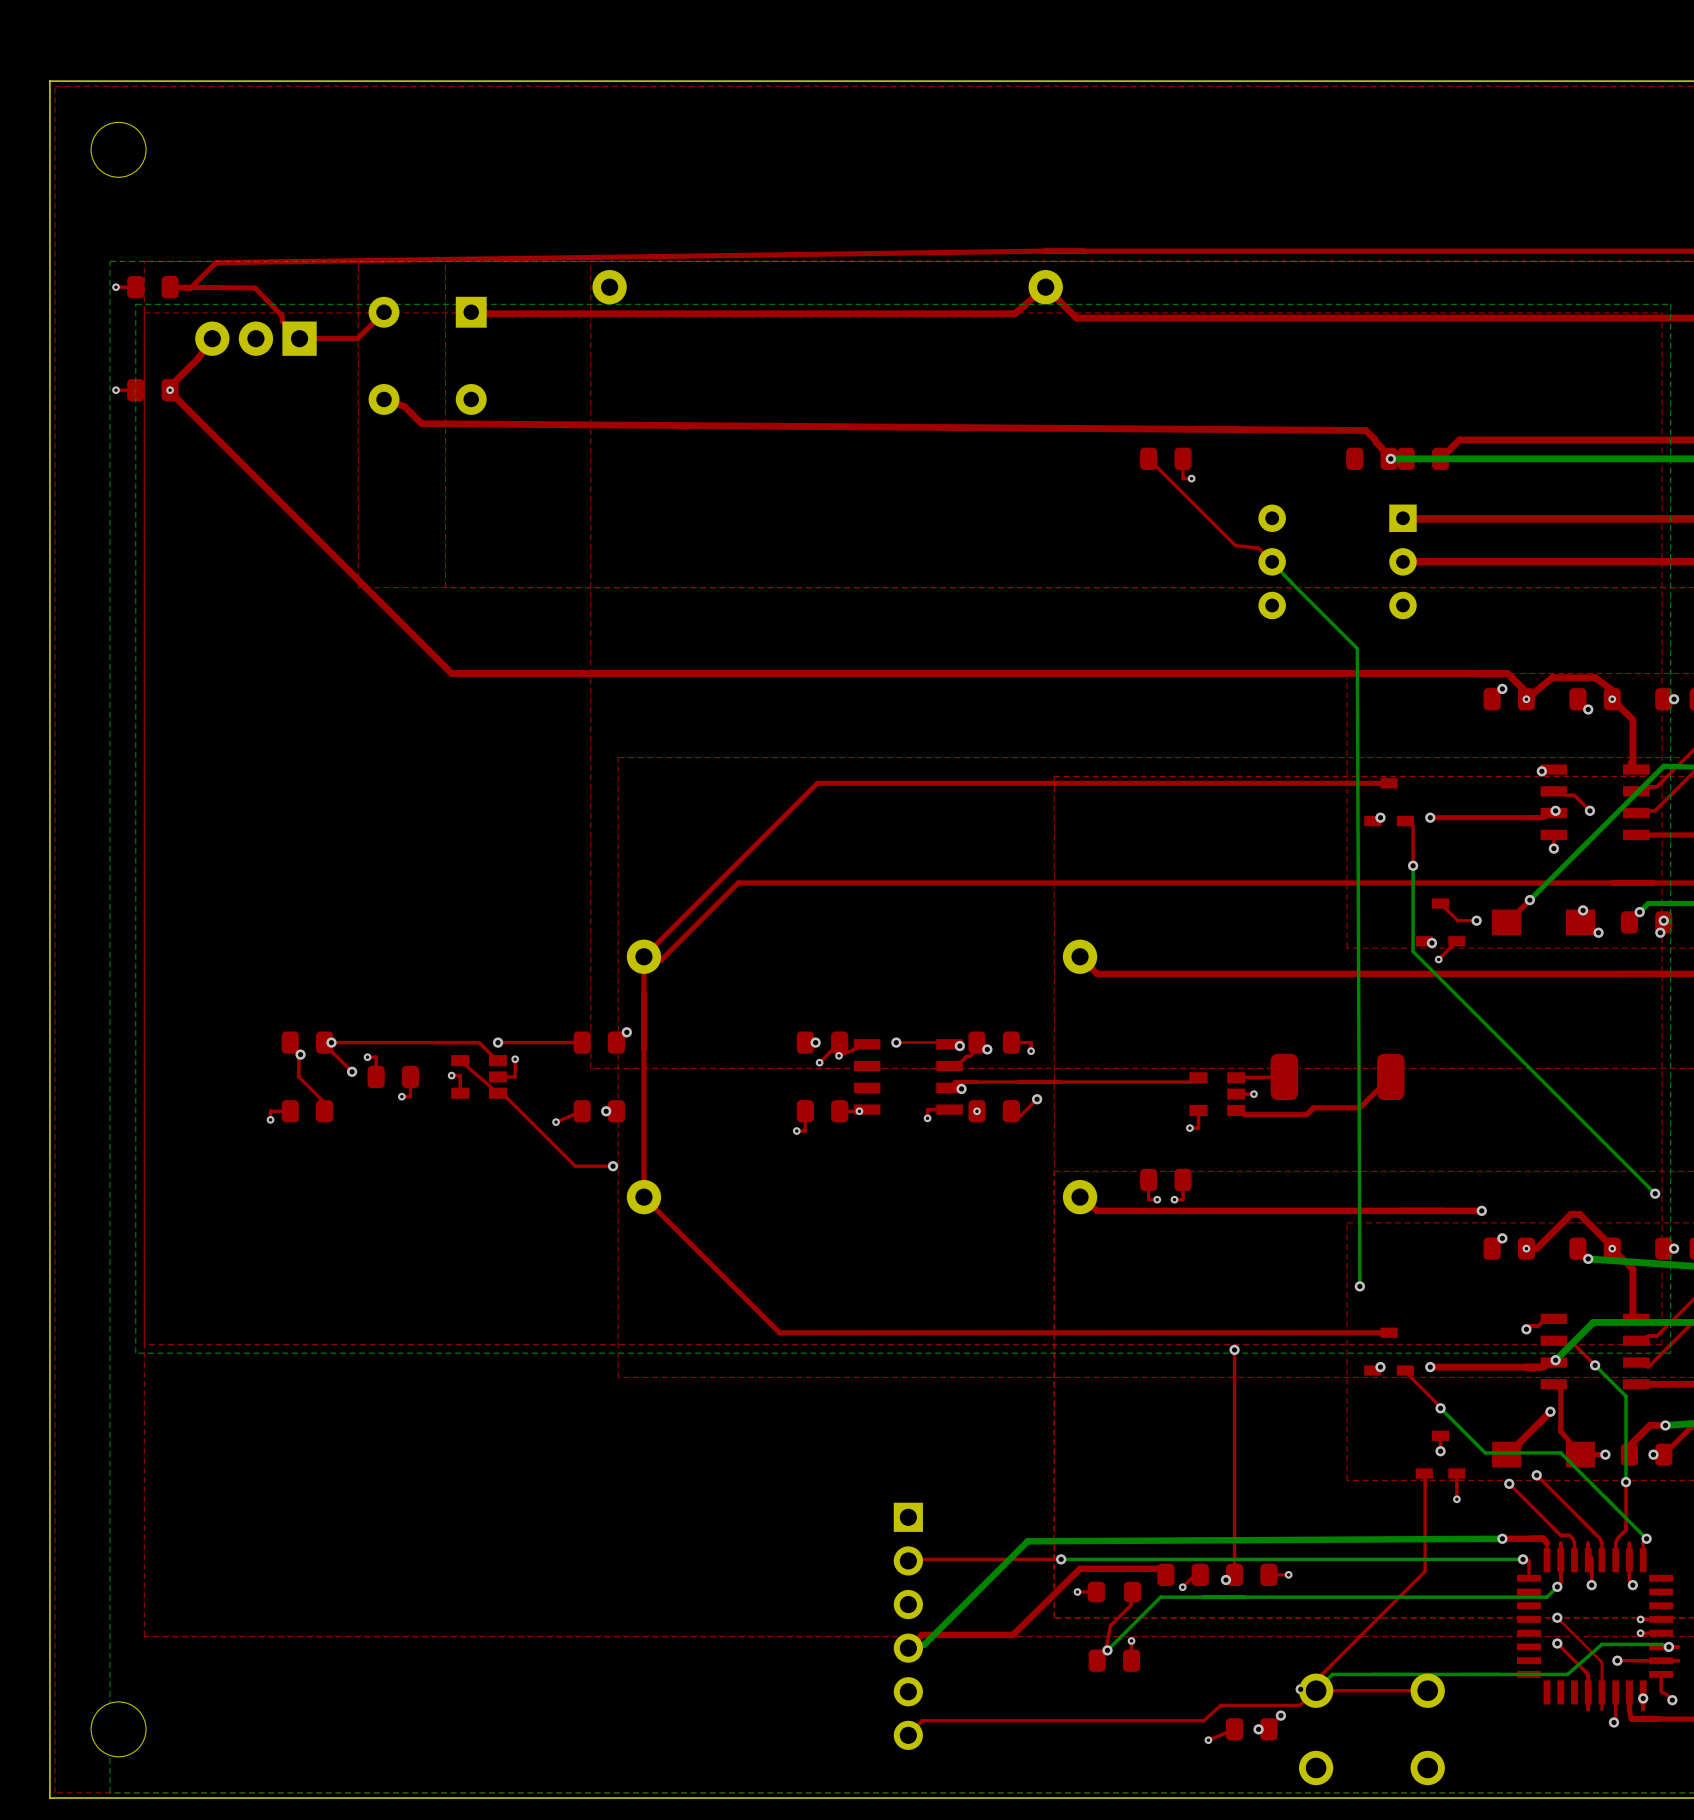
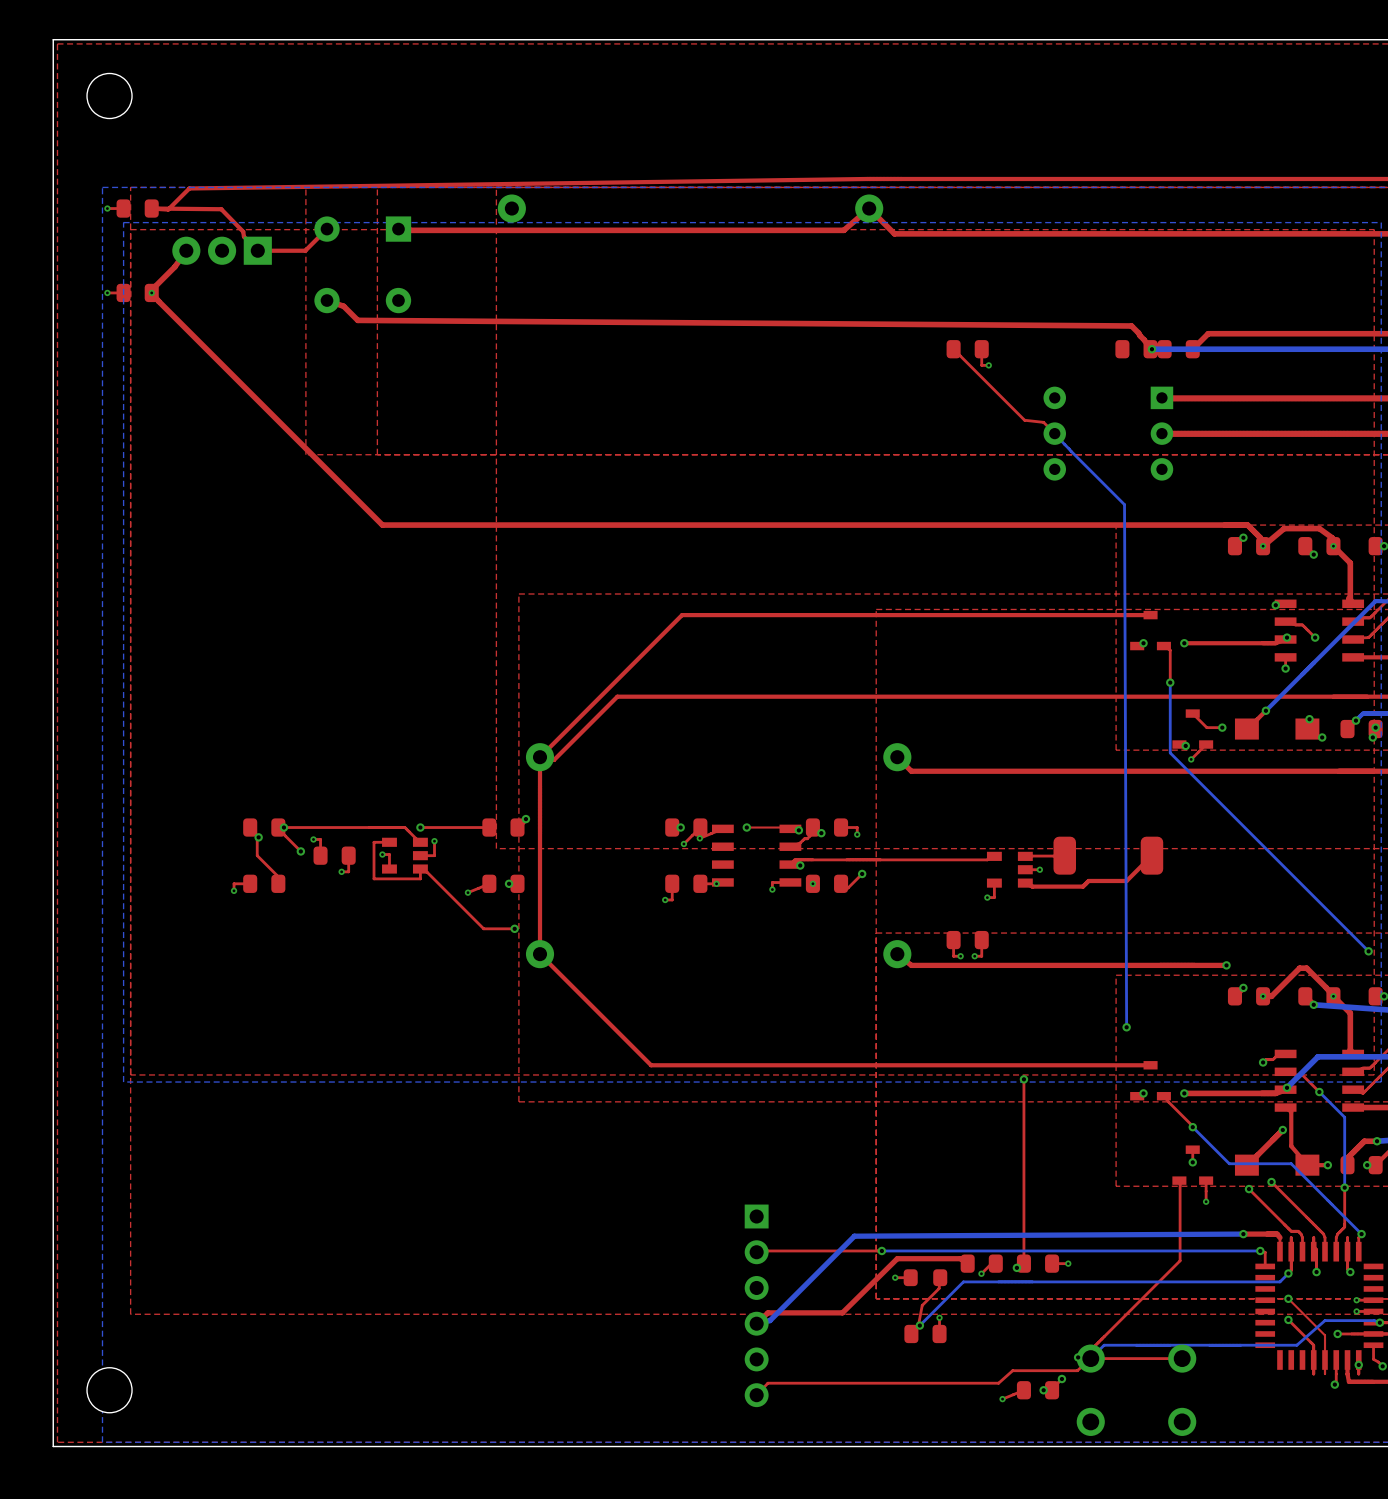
top track: (460, 1060) (498, 1093) -> (389, 842) (374, 842) (374, 878) (420, 878) (420, 869)

